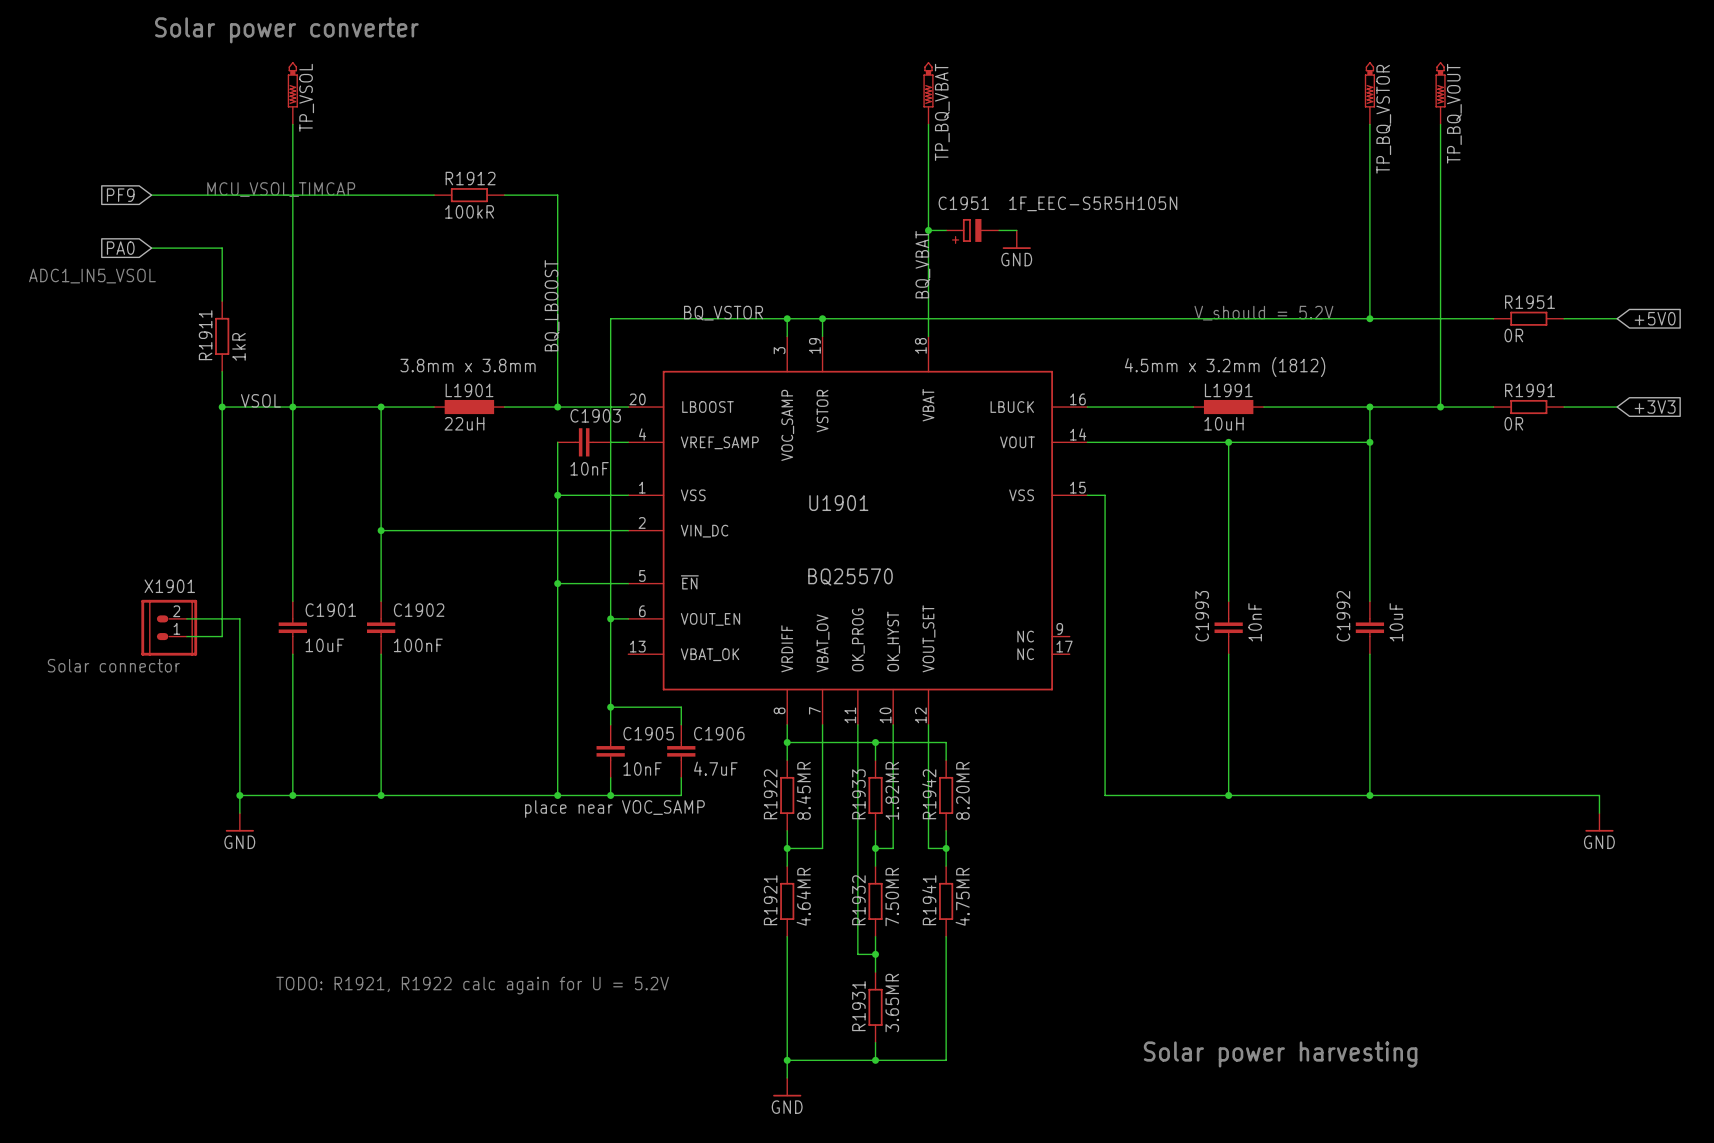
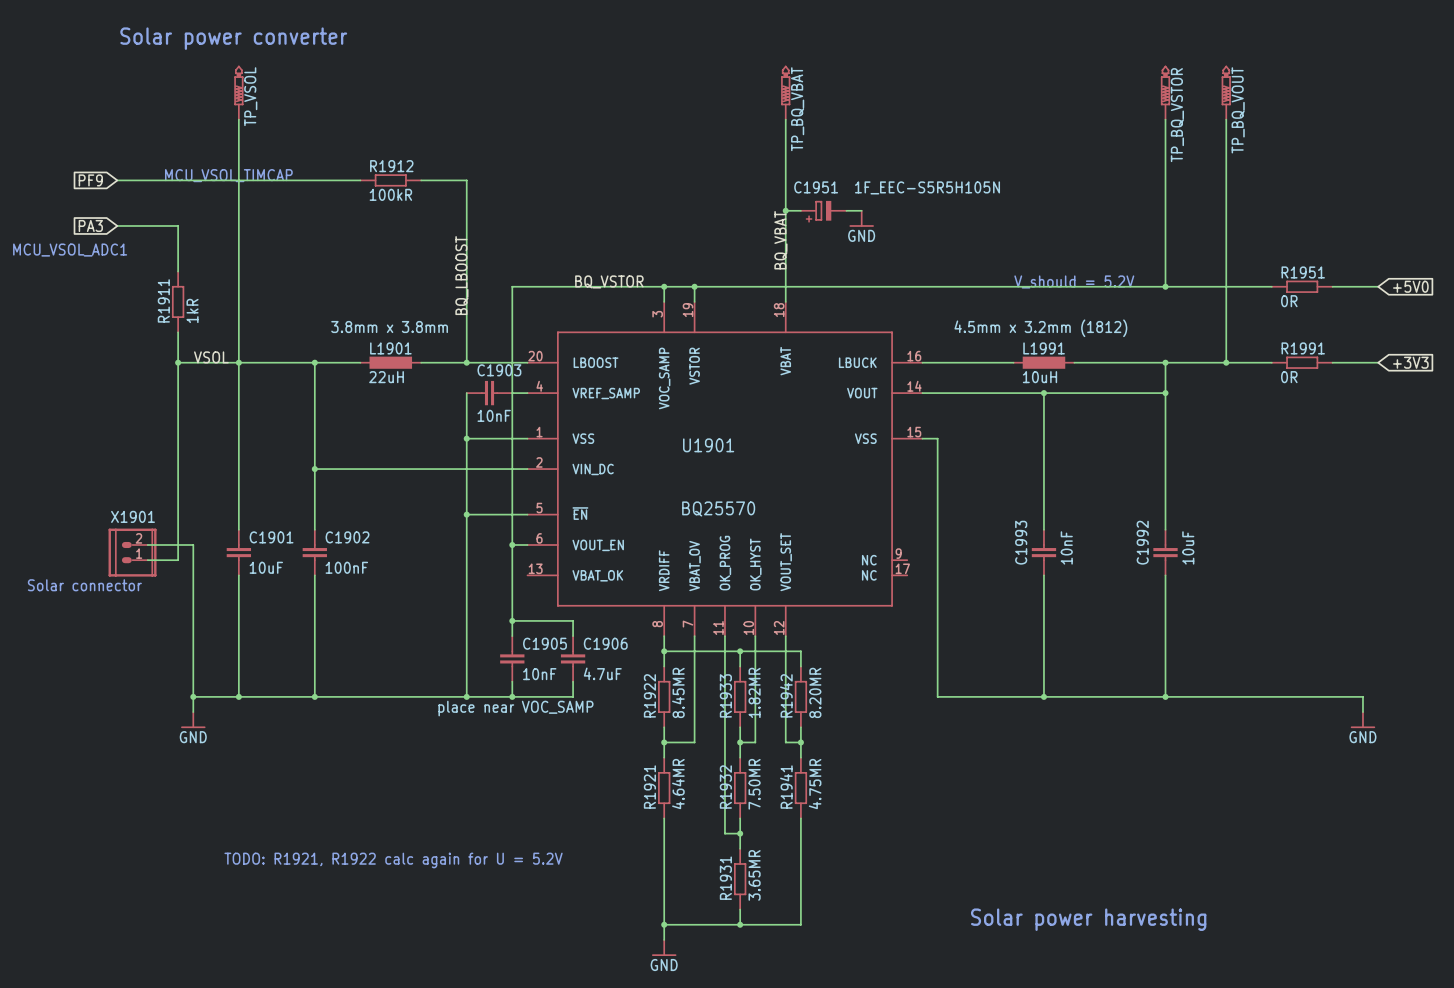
global label: PA0 (120, 248) -> PA3 (90, 225)
text: ADC1_IN5_VSOL (92, 276) -> MCU_VSOL_ADC1 (70, 250)

